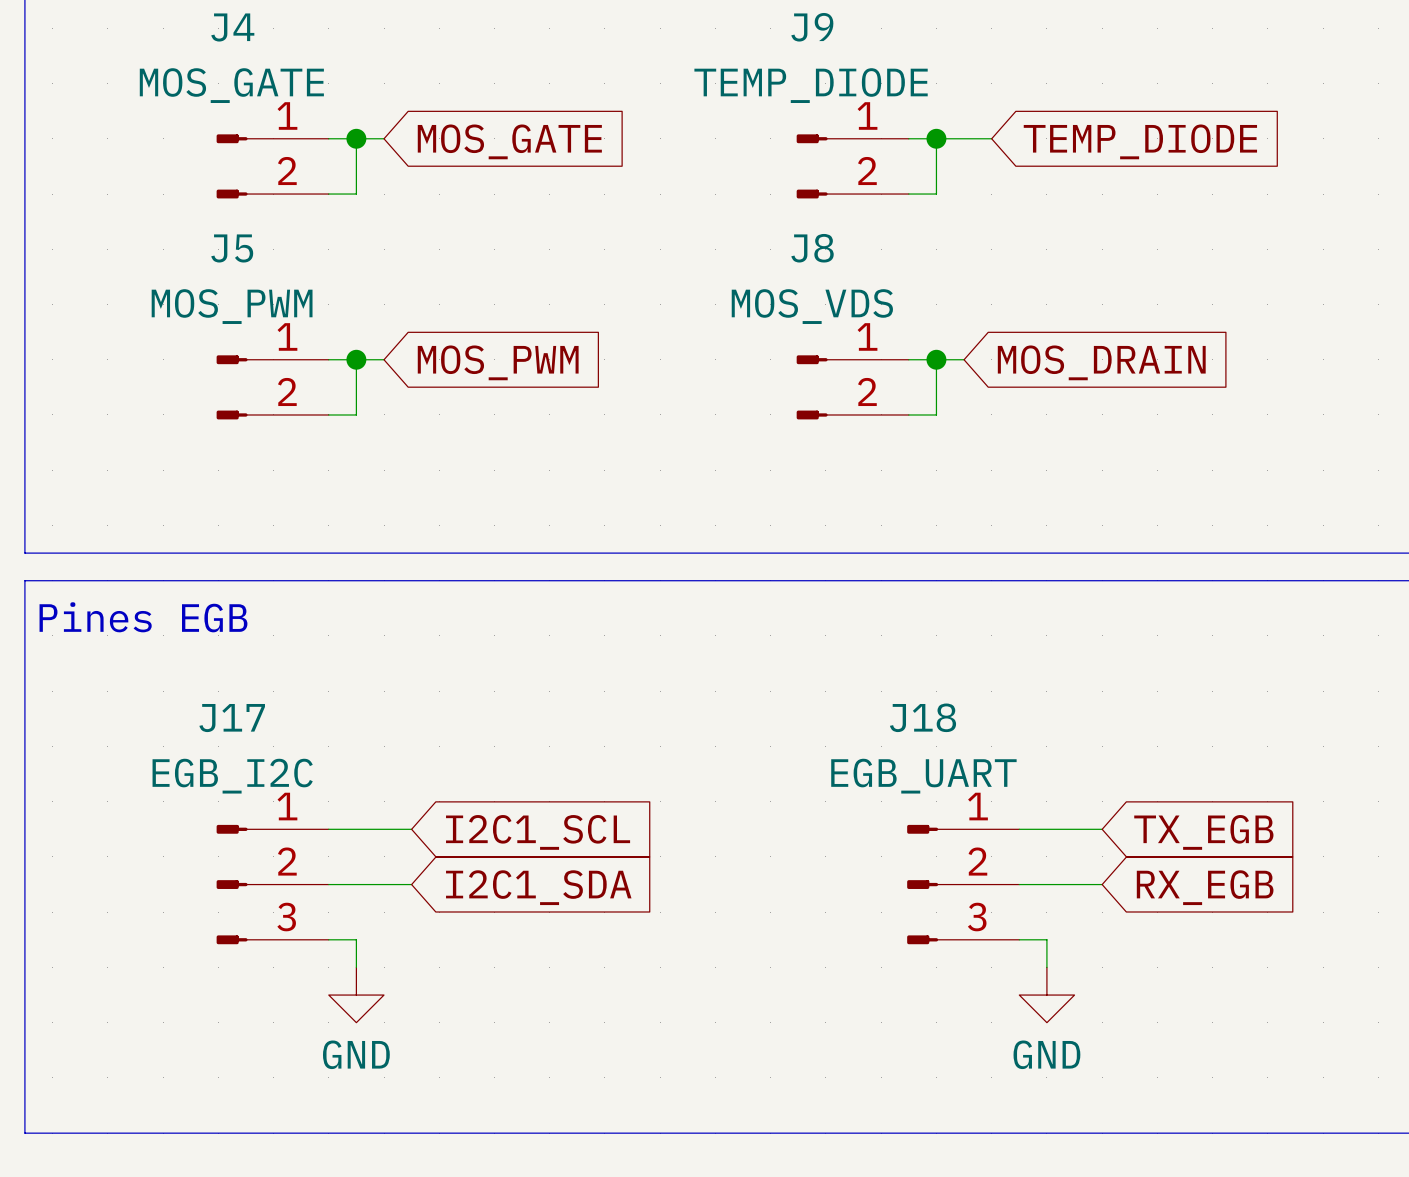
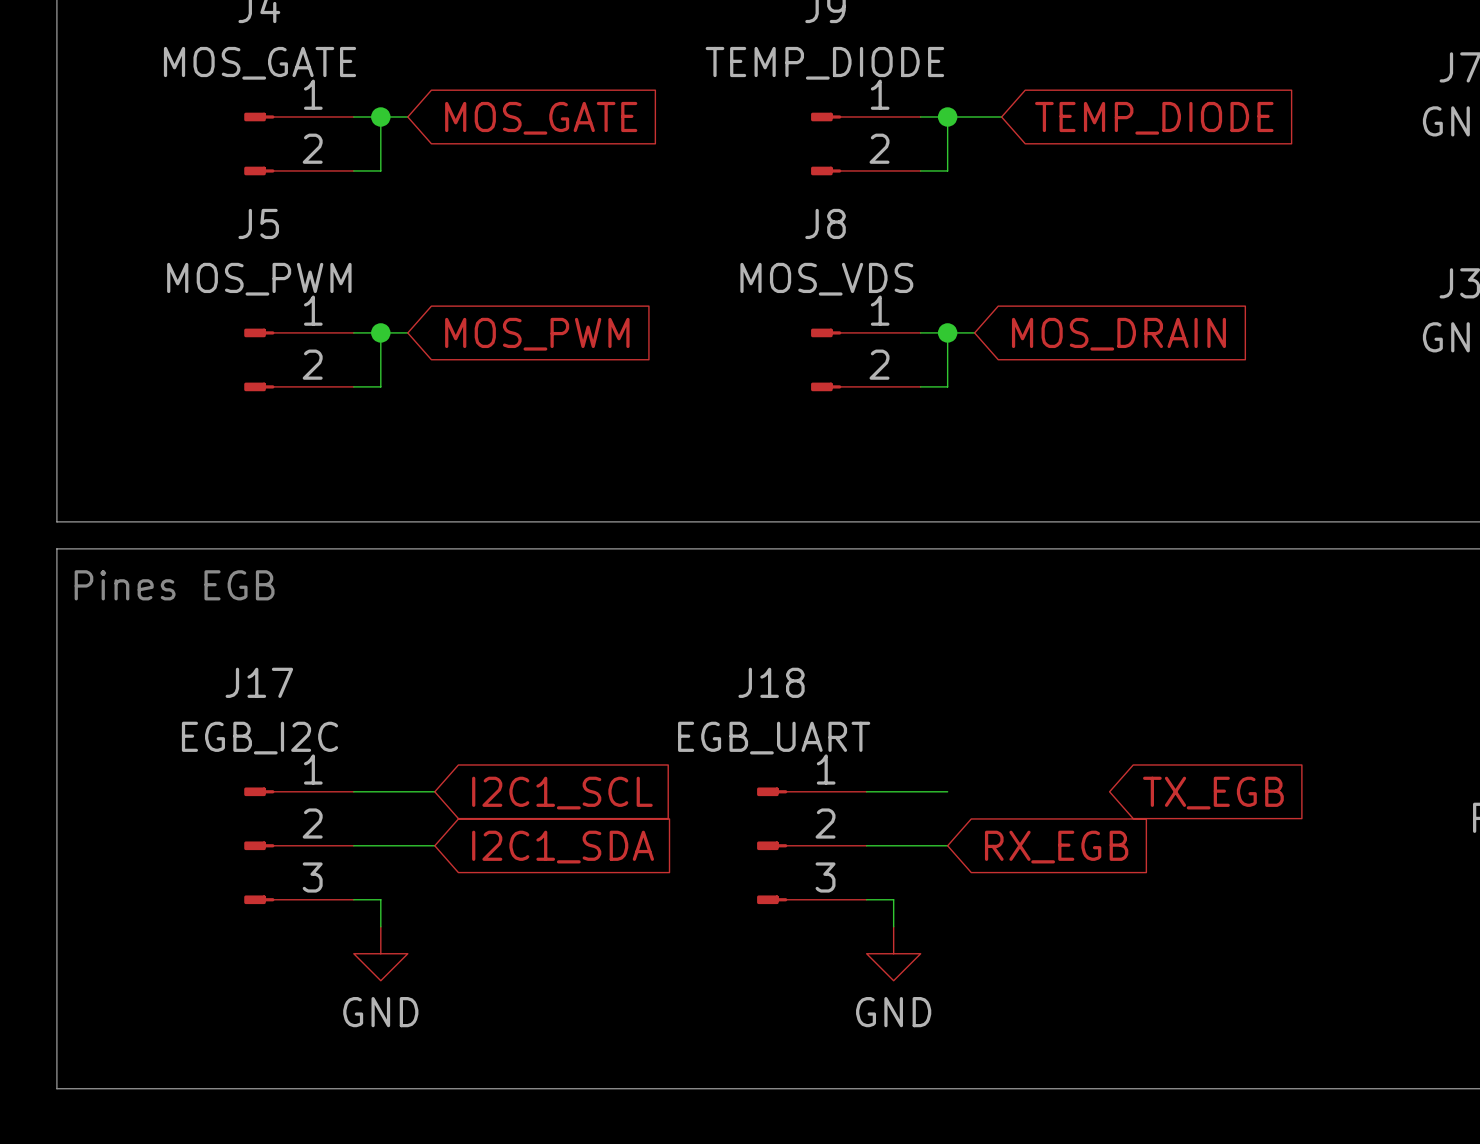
wire: (1019, 829) (1102, 829) -> (866, 791) (947, 791)
J18 position: (963, 884) -> (811, 845)
wire: (1019, 884) (1102, 884) -> (866, 845) (947, 845)
global label position: RX_EGB (1205, 887) -> RX_EGB (1056, 847)
wire: (1019, 939) (1046, 939) (1046, 967) -> (866, 899) (893, 899) (893, 926)
power symbol position: GND (1046, 995) -> GND (893, 953)

